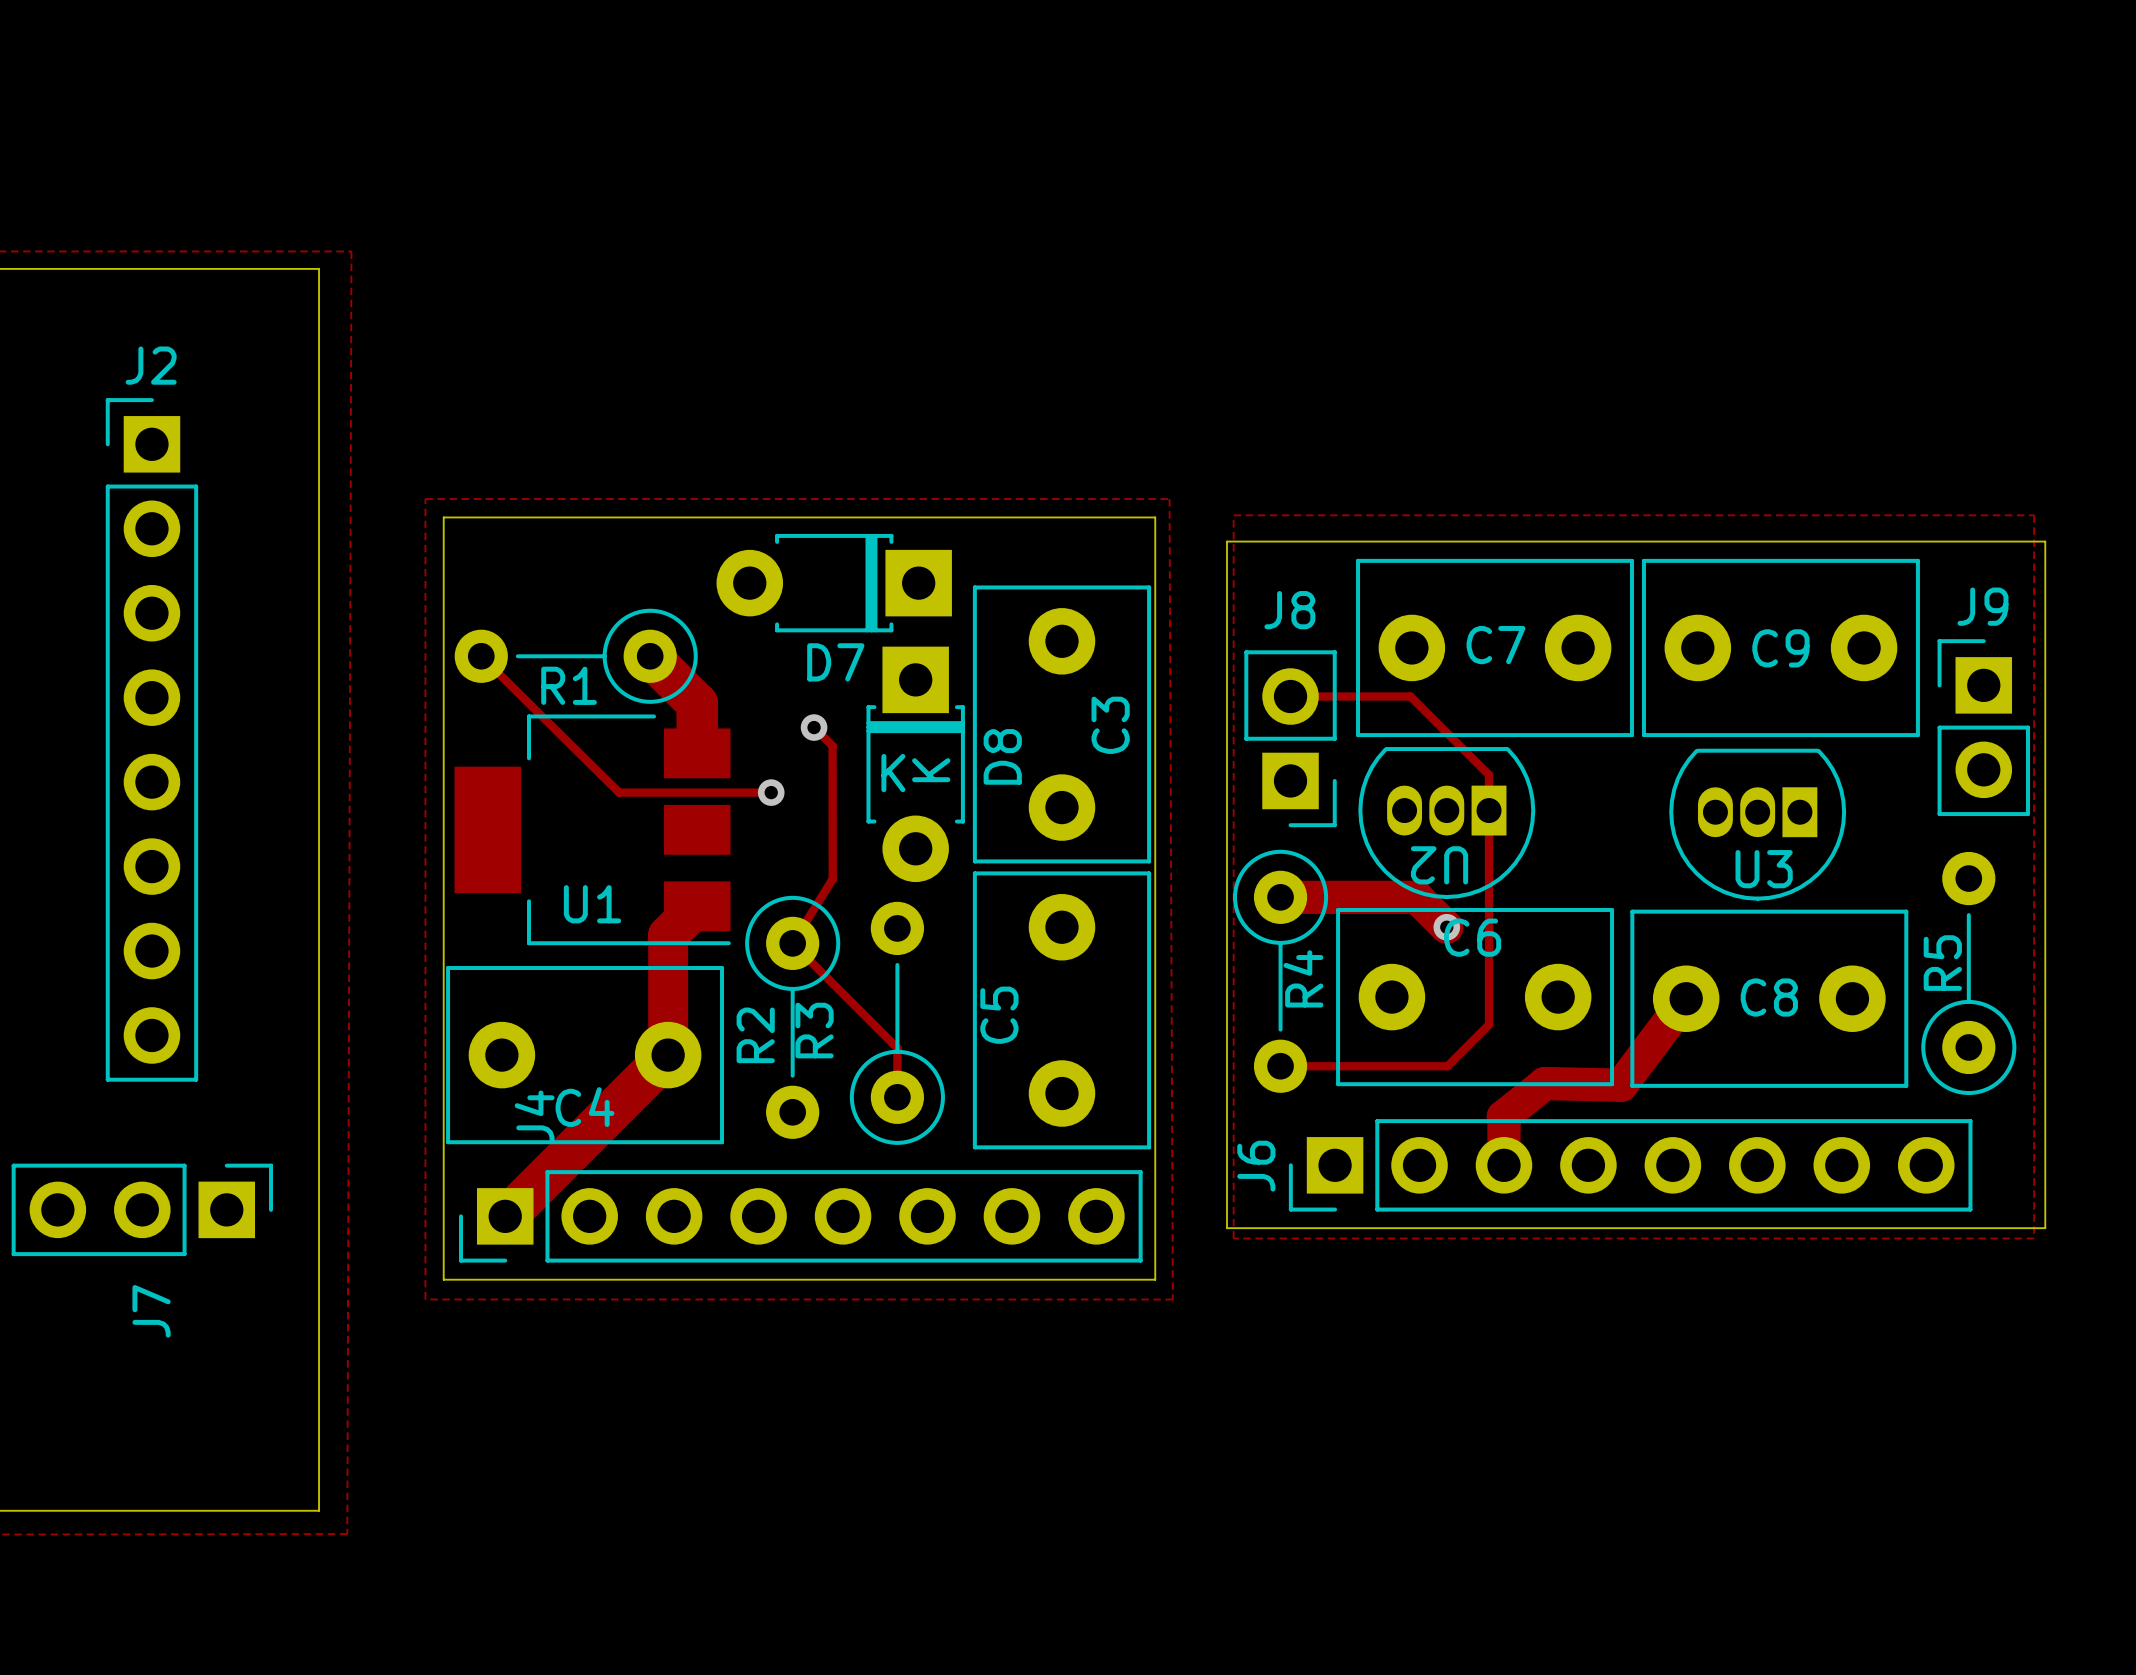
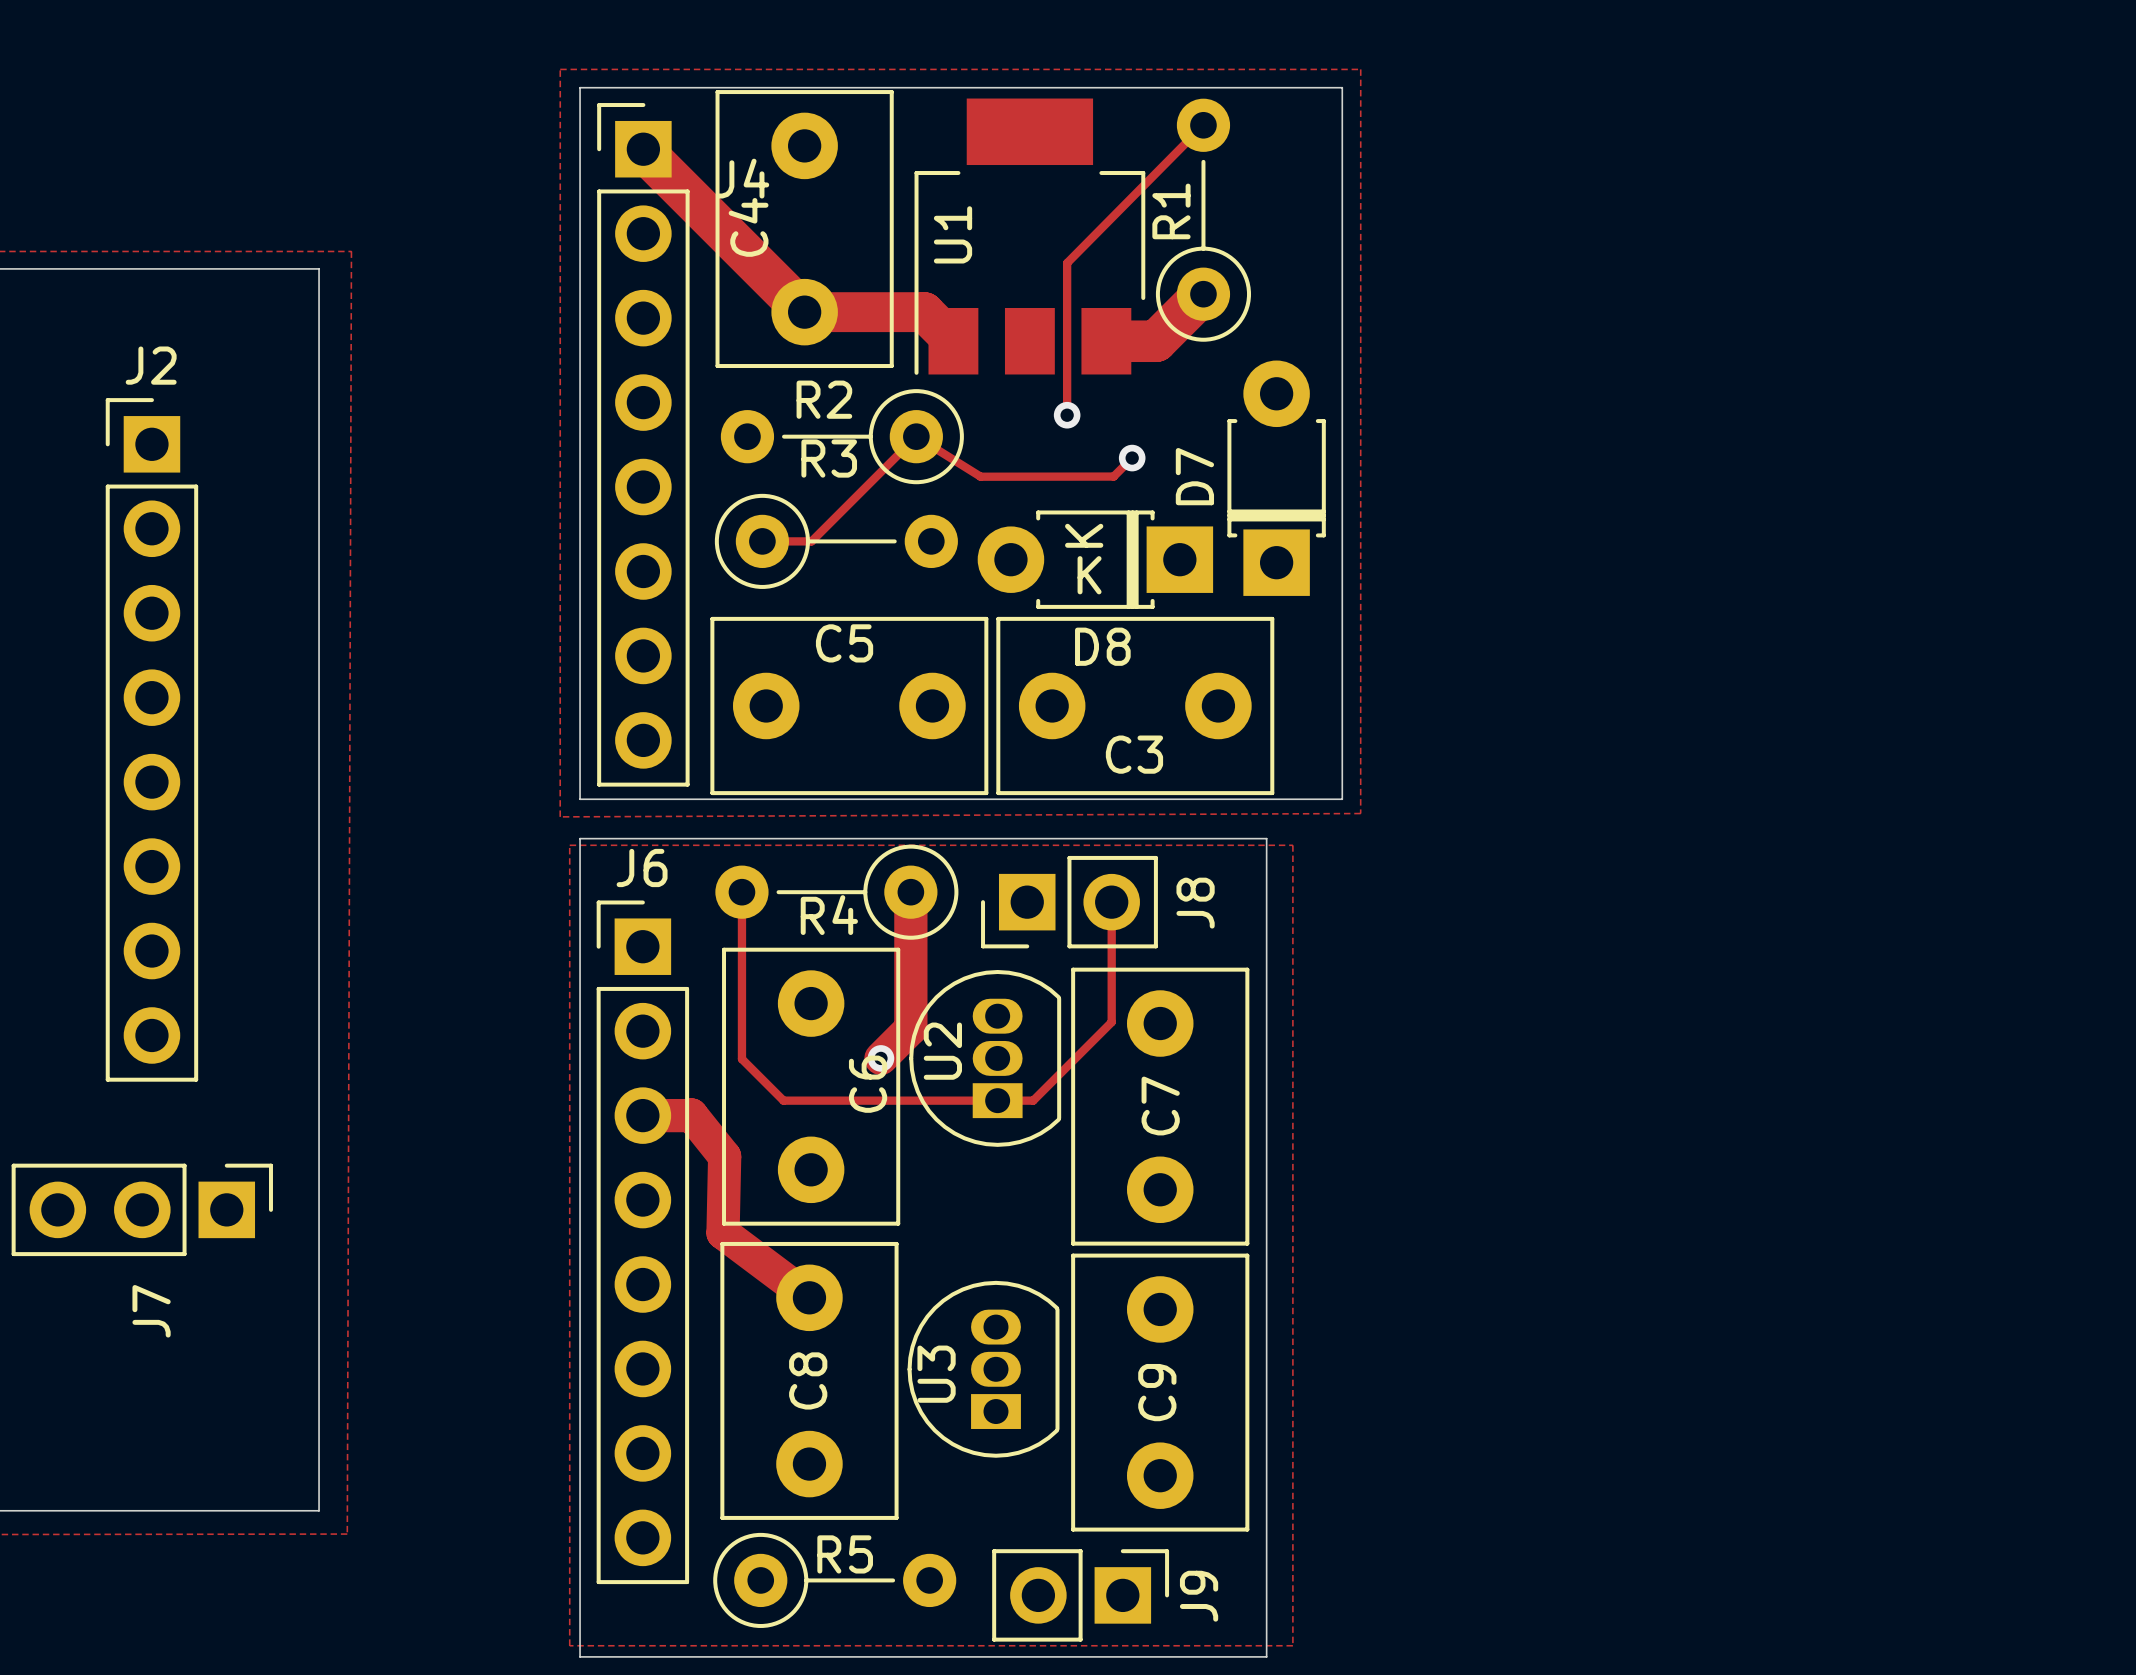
zone outline: none -> (560, 69) (560, 816) (1360, 813) (1360, 69) (560, 69)
board edge: none -> (580, 87) (580, 799) (1342, 799) (1342, 87) (580, 87)
track: none -> (1203, 125) (1067, 263) (1067, 415)
track: none -> (643, 149) (804, 312) (924, 312) (953, 341)
track: none -> (1204, 292) (1156, 341) (1106, 341)
via: none -> (1067, 415)
track: none -> (1132, 458) (1113, 476) (980, 476) (916, 436) (811, 541) (762, 541)
via: none -> (1132, 458)
zone outline: (425, 499) (425, 1299) (1172, 1299) (1169, 499) (425, 499) -> none
zone outline: (1233, 515) (1233, 1238) (2034, 1238) (2034, 515) (1233, 515) -> none
board edge: (443, 517) (1155, 517) (1155, 1279) (443, 1279) (443, 517) -> none
board edge: (1227, 541) (2045, 541) (2045, 1228) (1227, 1228) (1227, 541) -> none
D7 rotation: 0° (834, 583) -> 90° clockwise (1276, 478)
D7 position: (834, 583) -> (1276, 478)
C7 rotation: 0° (1495, 647) -> 90° clockwise (1160, 1106)
C7 position: (1495, 647) -> (1160, 1106)
C9 rotation: 0° (1780, 647) -> 90° clockwise (1160, 1392)
C9 position: (1780, 647) -> (1160, 1392)
track: (648, 655) (697, 703) (697, 753) -> none
track: (481, 656) (619, 792) (771, 792) -> none
R1 rotation: 0° (576, 656) -> 90° clockwise (1203, 220)
R1 position: (576, 656) -> (1203, 220)
track: (1290, 696) (1410, 696) (1489, 774) (1489, 1024) (1447, 1066) (1280, 1066) -> none
C3 rotation: 0° (1061, 724) -> 90° clockwise (1135, 705)
track: (814, 727) (832, 746) (832, 879) (792, 943) (897, 1048) (897, 1097) -> none
via: (814, 727) -> none
J9 rotation: 0° (1983, 727) -> 90° clockwise (1080, 1595)
J9 position: (1983, 727) -> (1080, 1595)
J8 rotation: 0° (1290, 738) -> 90° clockwise (1069, 902)
J8 position: (1290, 738) -> (1069, 902)
D8 rotation: 0° (915, 764) -> 90° clockwise (1095, 559)
D8 position: (915, 764) -> (1095, 559)
via: (771, 792) -> none
U2 rotation: 0° (1446, 823) -> 90° clockwise (985, 1058)
U2 position: (1446, 823) -> (985, 1058)
U3 rotation: 0° (1757, 824) -> 90° clockwise (983, 1369)
U3 position: (1757, 824) -> (983, 1369)
U1 rotation: 0° (592, 829) -> 90° clockwise (1029, 236)
U1 position: (592, 829) -> (1029, 236)
board edge: none -> (580, 838) (1266, 838) (1266, 1656) (580, 1656) (580, 838)
zone outline: none -> (569, 845) (569, 1645) (1292, 1645) (1292, 845) (569, 845)
track: none -> (741, 892) (741, 1059) (783, 1100) (1033, 1100) (1111, 1022) (1111, 902)
track: none -> (910, 892) (910, 1028) (880, 1058)
track: (1280, 897) (1416, 897) (1446, 927) -> none
track: (697, 906) (668, 935) (668, 1055) (505, 1216) -> none
via: (1446, 927) -> none
R4 rotation: 0° (1280, 971) -> 90° clockwise (836, 892)
R4 position: (1280, 971) -> (836, 892)
R5 rotation: 0° (1968, 973) -> 90° clockwise (834, 1580)
R5 position: (1968, 973) -> (834, 1580)
C6 rotation: 0° (1475, 997) -> 90° clockwise (811, 1086)
C6 position: (1475, 997) -> (811, 1086)
track: (1686, 998) (1621, 1085) (1544, 1083) (1503, 1116) (1503, 1165) -> none
C8 rotation: 0° (1769, 998) -> 90° clockwise (809, 1380)
C8 position: (1769, 998) -> (809, 1380)
C5 rotation: 0° (1061, 1010) -> 90° clockwise (849, 705)
C5 position: (1061, 1010) -> (849, 705)
R2 rotation: 0° (792, 1017) -> 90° clockwise (842, 436)
R2 position: (792, 1017) -> (842, 436)
R3 rotation: 0° (897, 1023) -> 90° clockwise (836, 541)
R3 position: (897, 1023) -> (836, 541)
C4 rotation: 0° (585, 1055) -> 90° clockwise (804, 229)
C4 position: (585, 1055) -> (804, 229)
via: none -> (880, 1058)
track: none -> (642, 1115) (691, 1114) (724, 1156) (723, 1232) (809, 1297)
J6 rotation: 0° (1630, 1165) -> 90° clockwise (642, 1242)
J6 position: (1630, 1165) -> (642, 1242)
J4 rotation: 0° (800, 1216) -> 90° clockwise (643, 444)
J4 position: (800, 1216) -> (643, 444)

